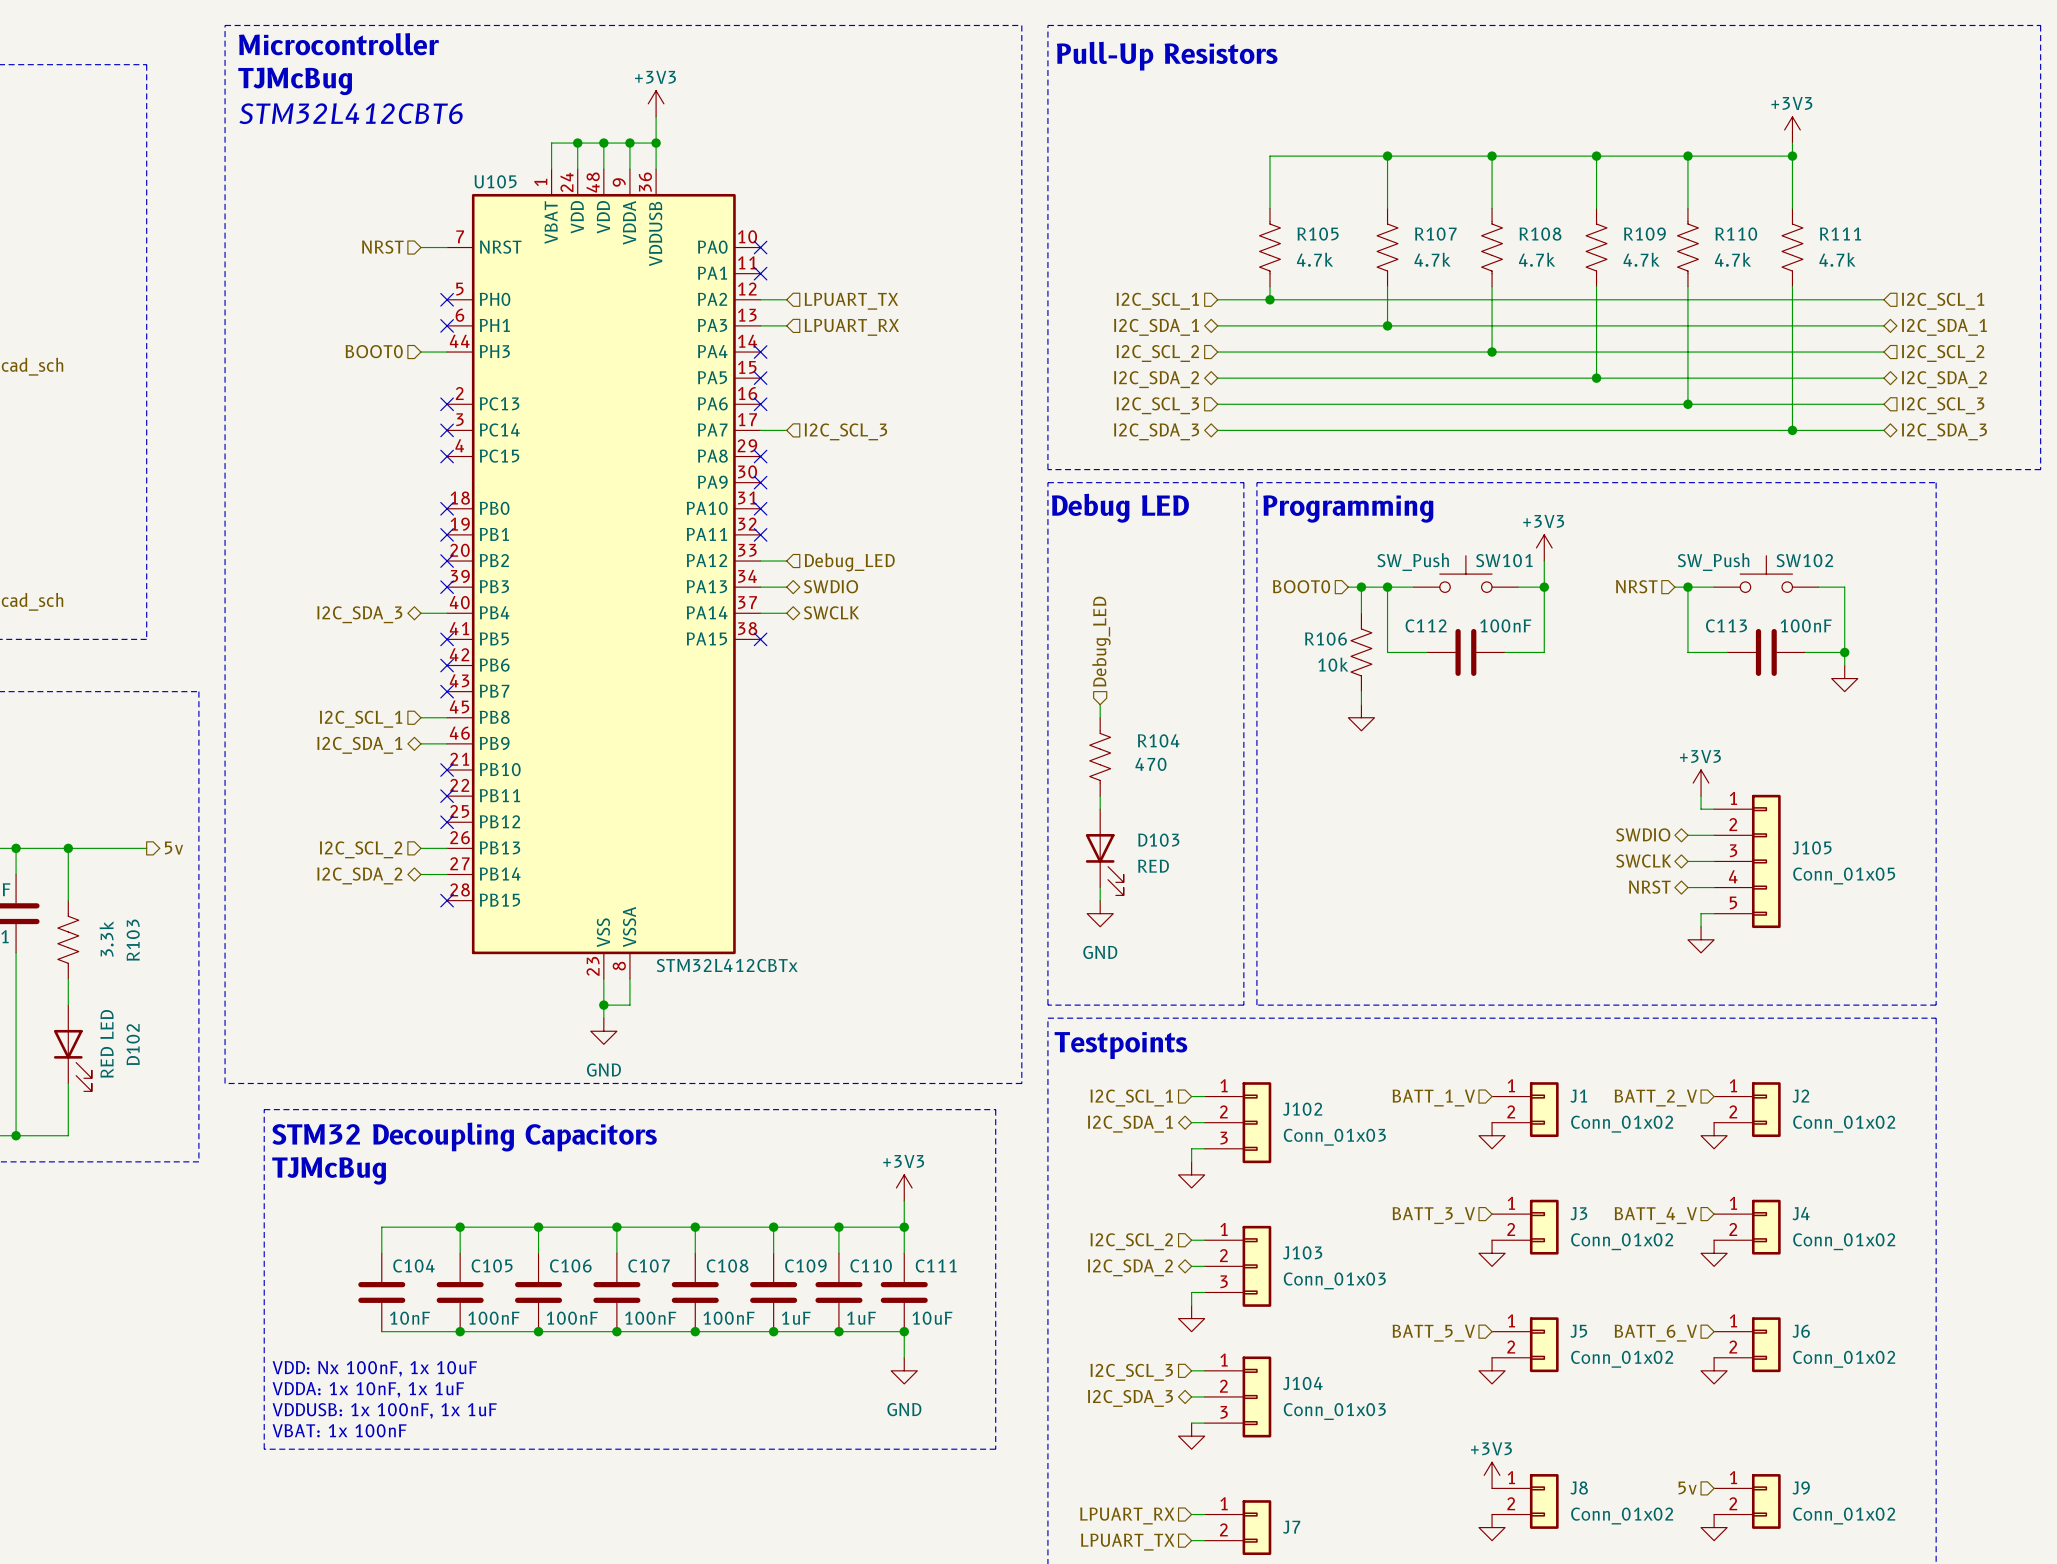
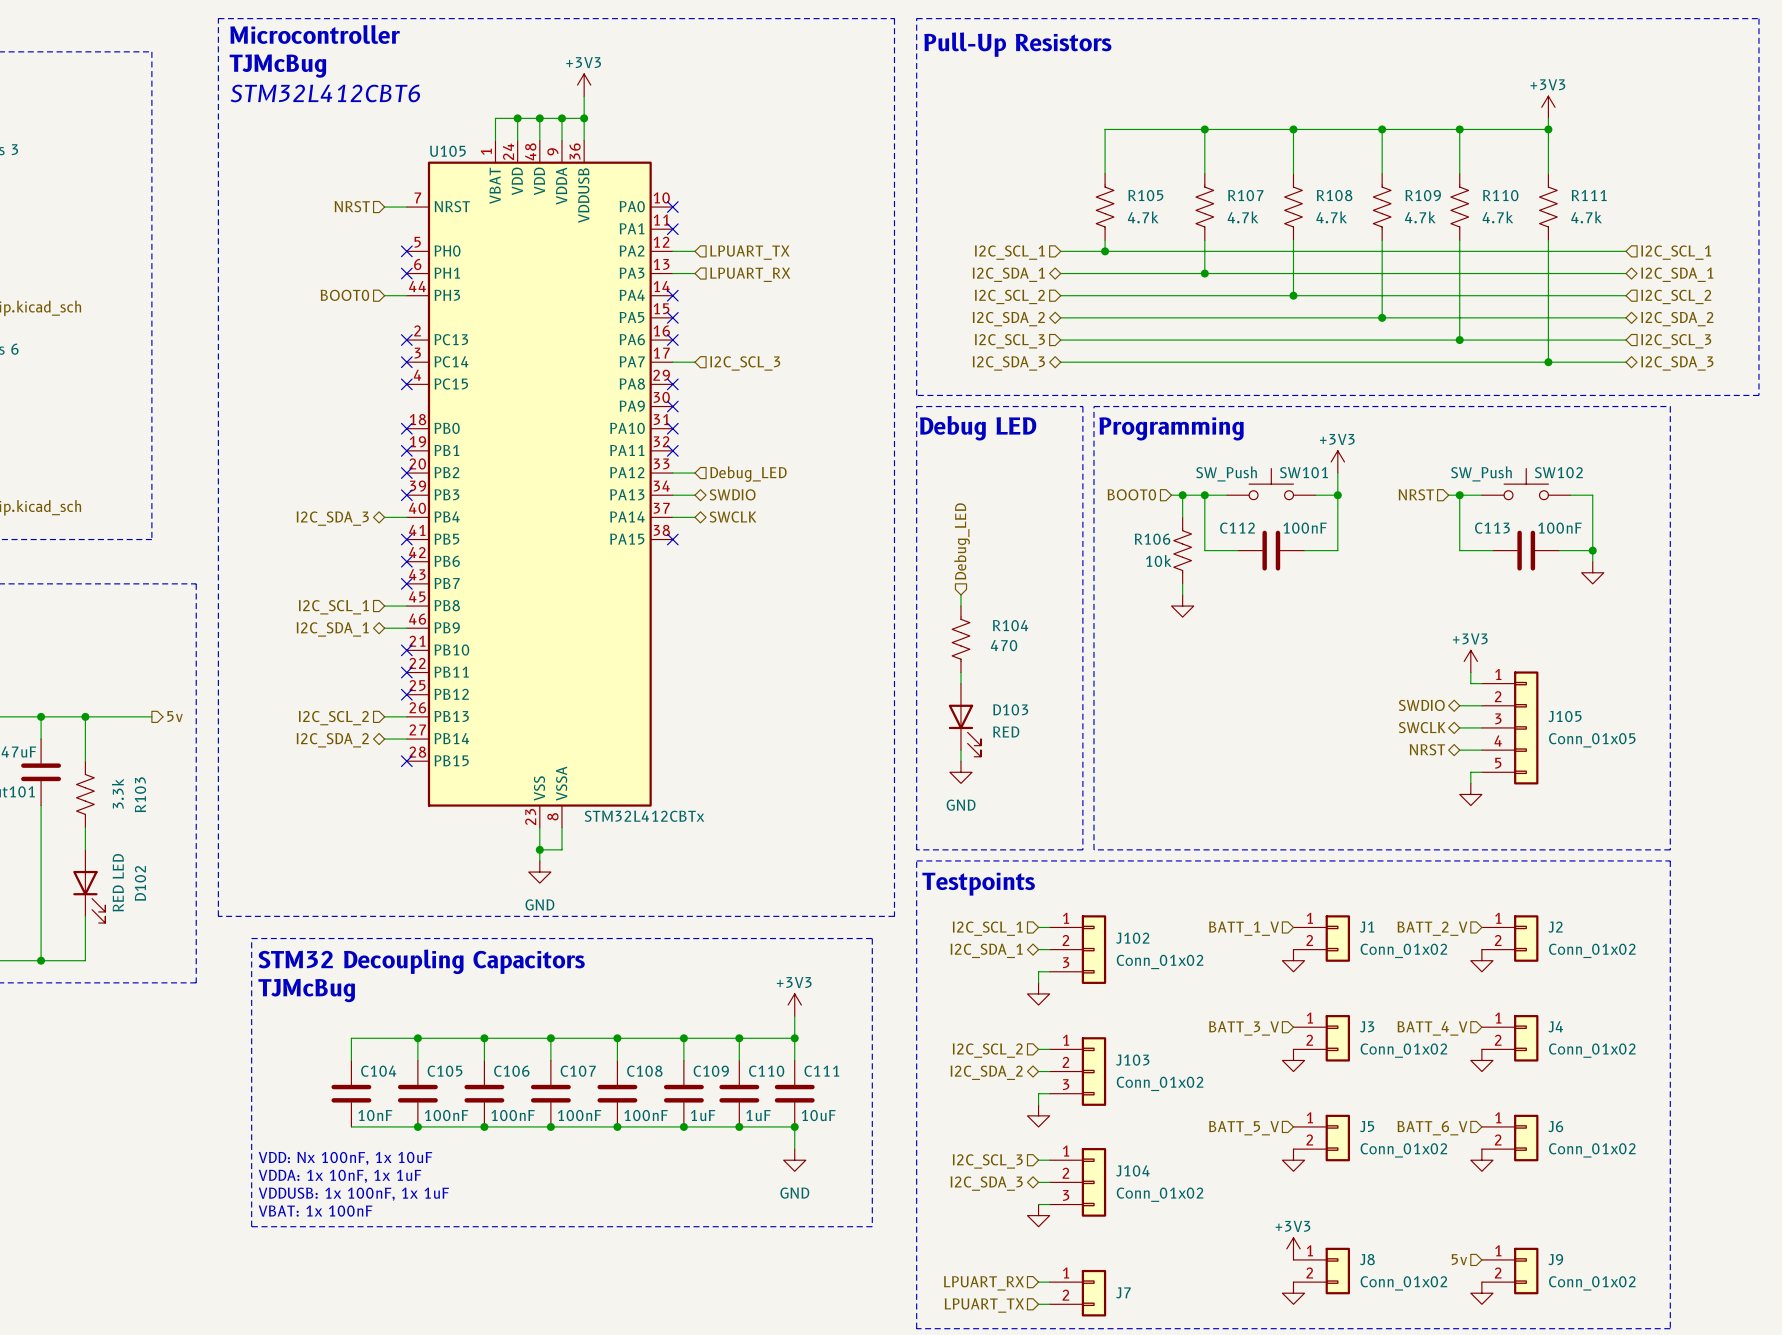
J102 value: Conn_01x03 (1334, 1137) -> Conn_01x02 (1160, 961)
J103 value: Conn_01x03 (1334, 1280) -> Conn_01x02 (1160, 1083)
J104 value: Conn_01x03 (1334, 1411) -> Conn_01x02 (1160, 1194)

